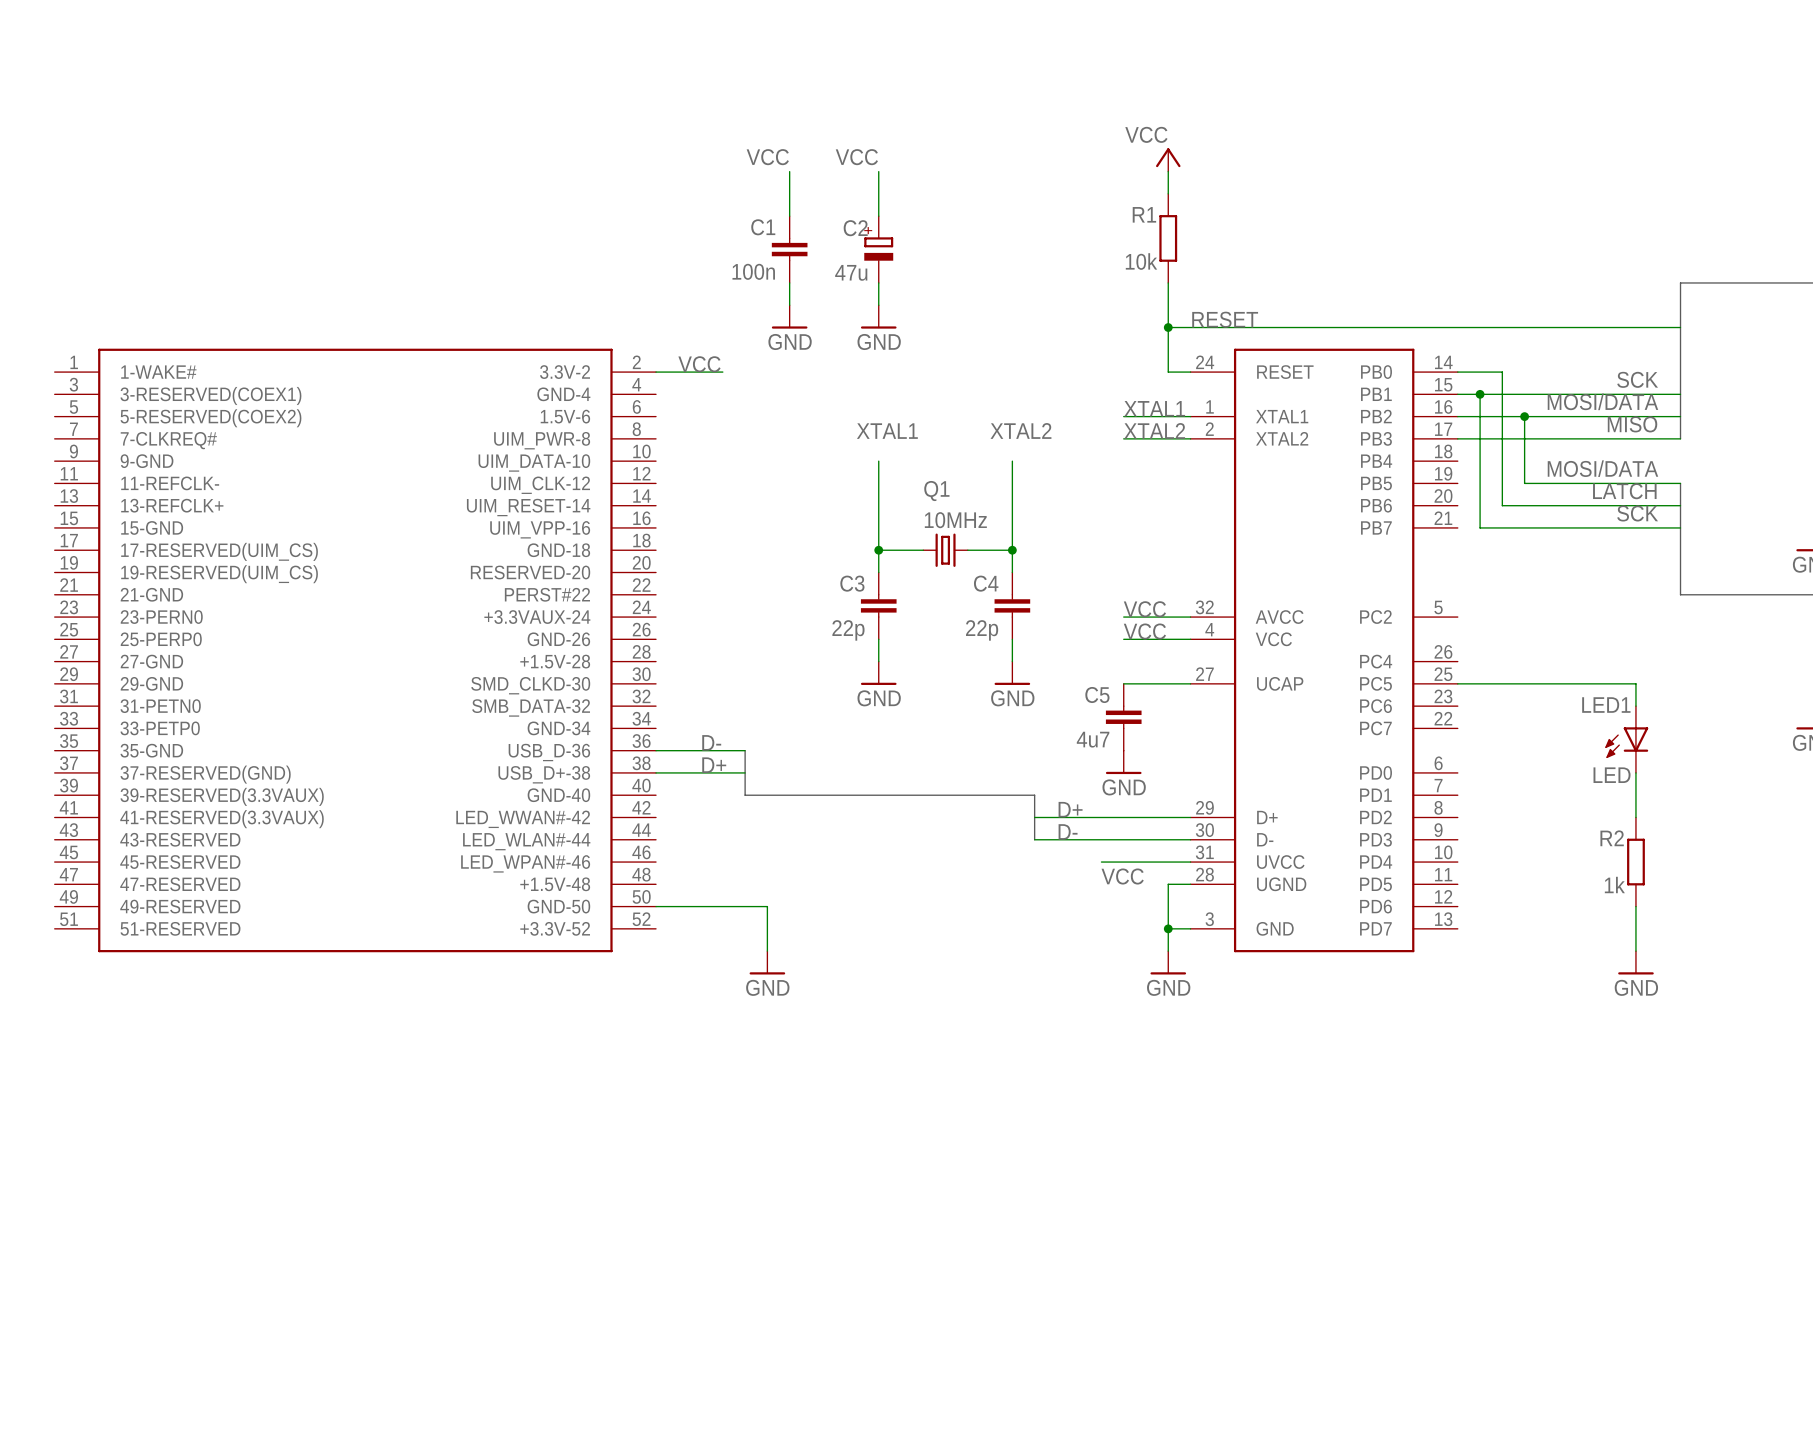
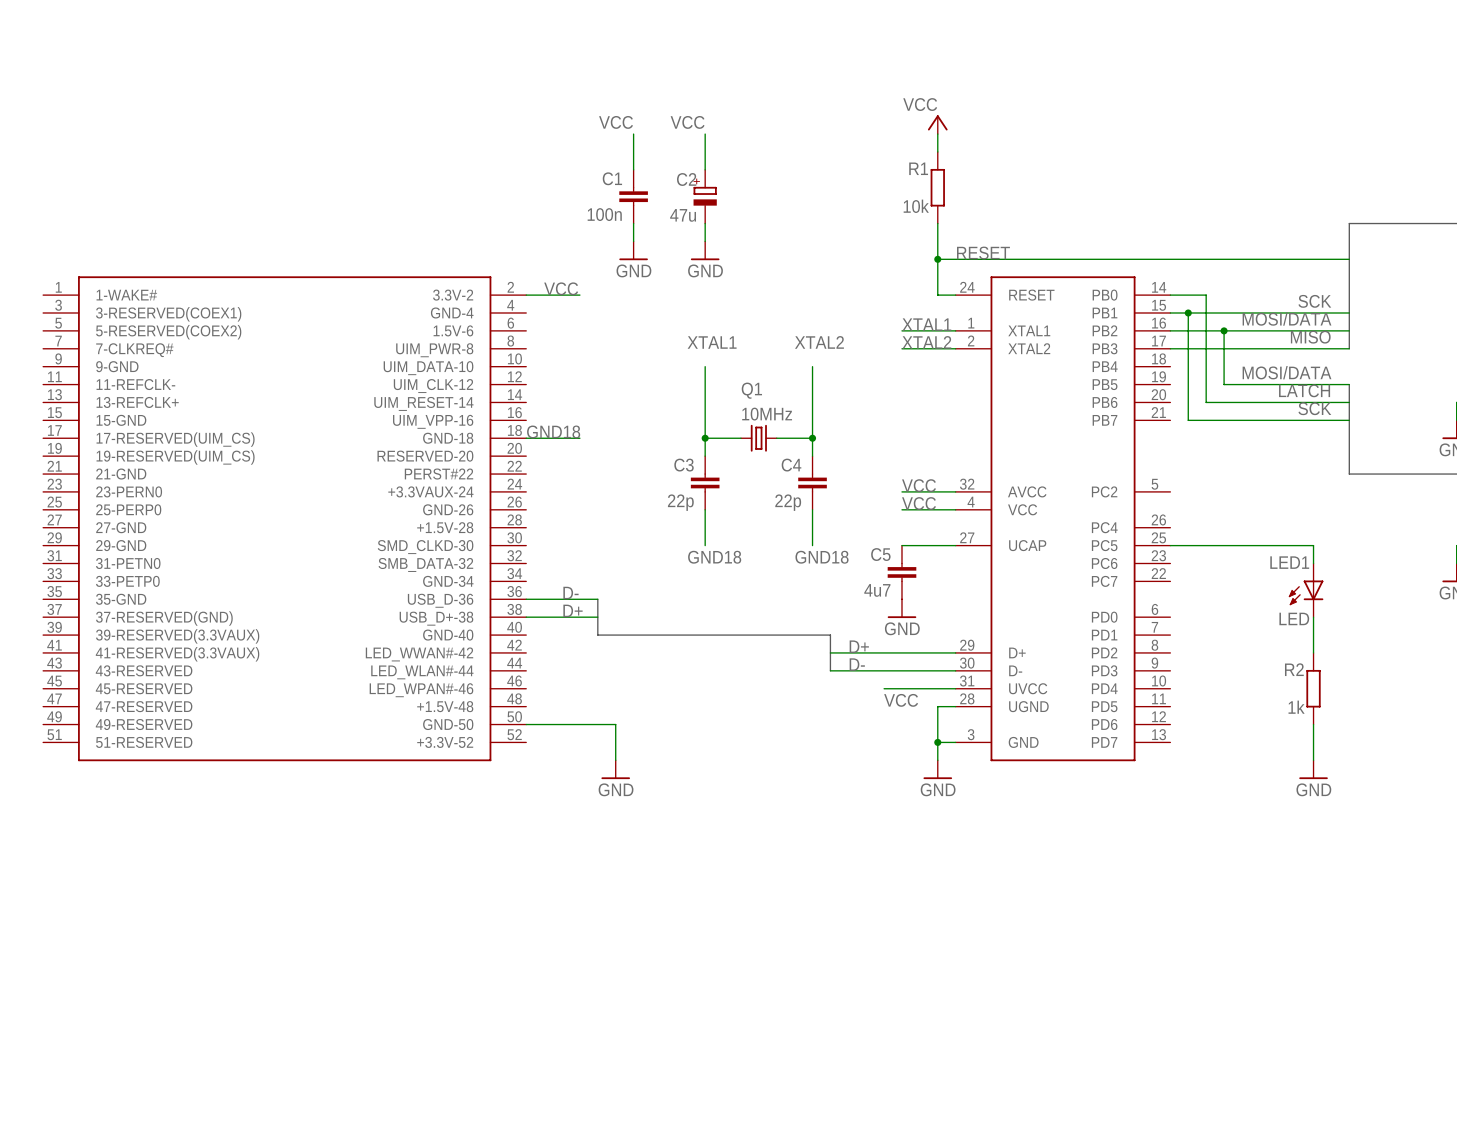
label: none -> GND18 (553, 431)
wire: none -> (526, 438) (579, 438)
power symbol: GND (878, 673) -> none
power symbol: GND (1012, 673) -> none
label: none -> GND18 (714, 557)
label: none -> GND18 (822, 557)

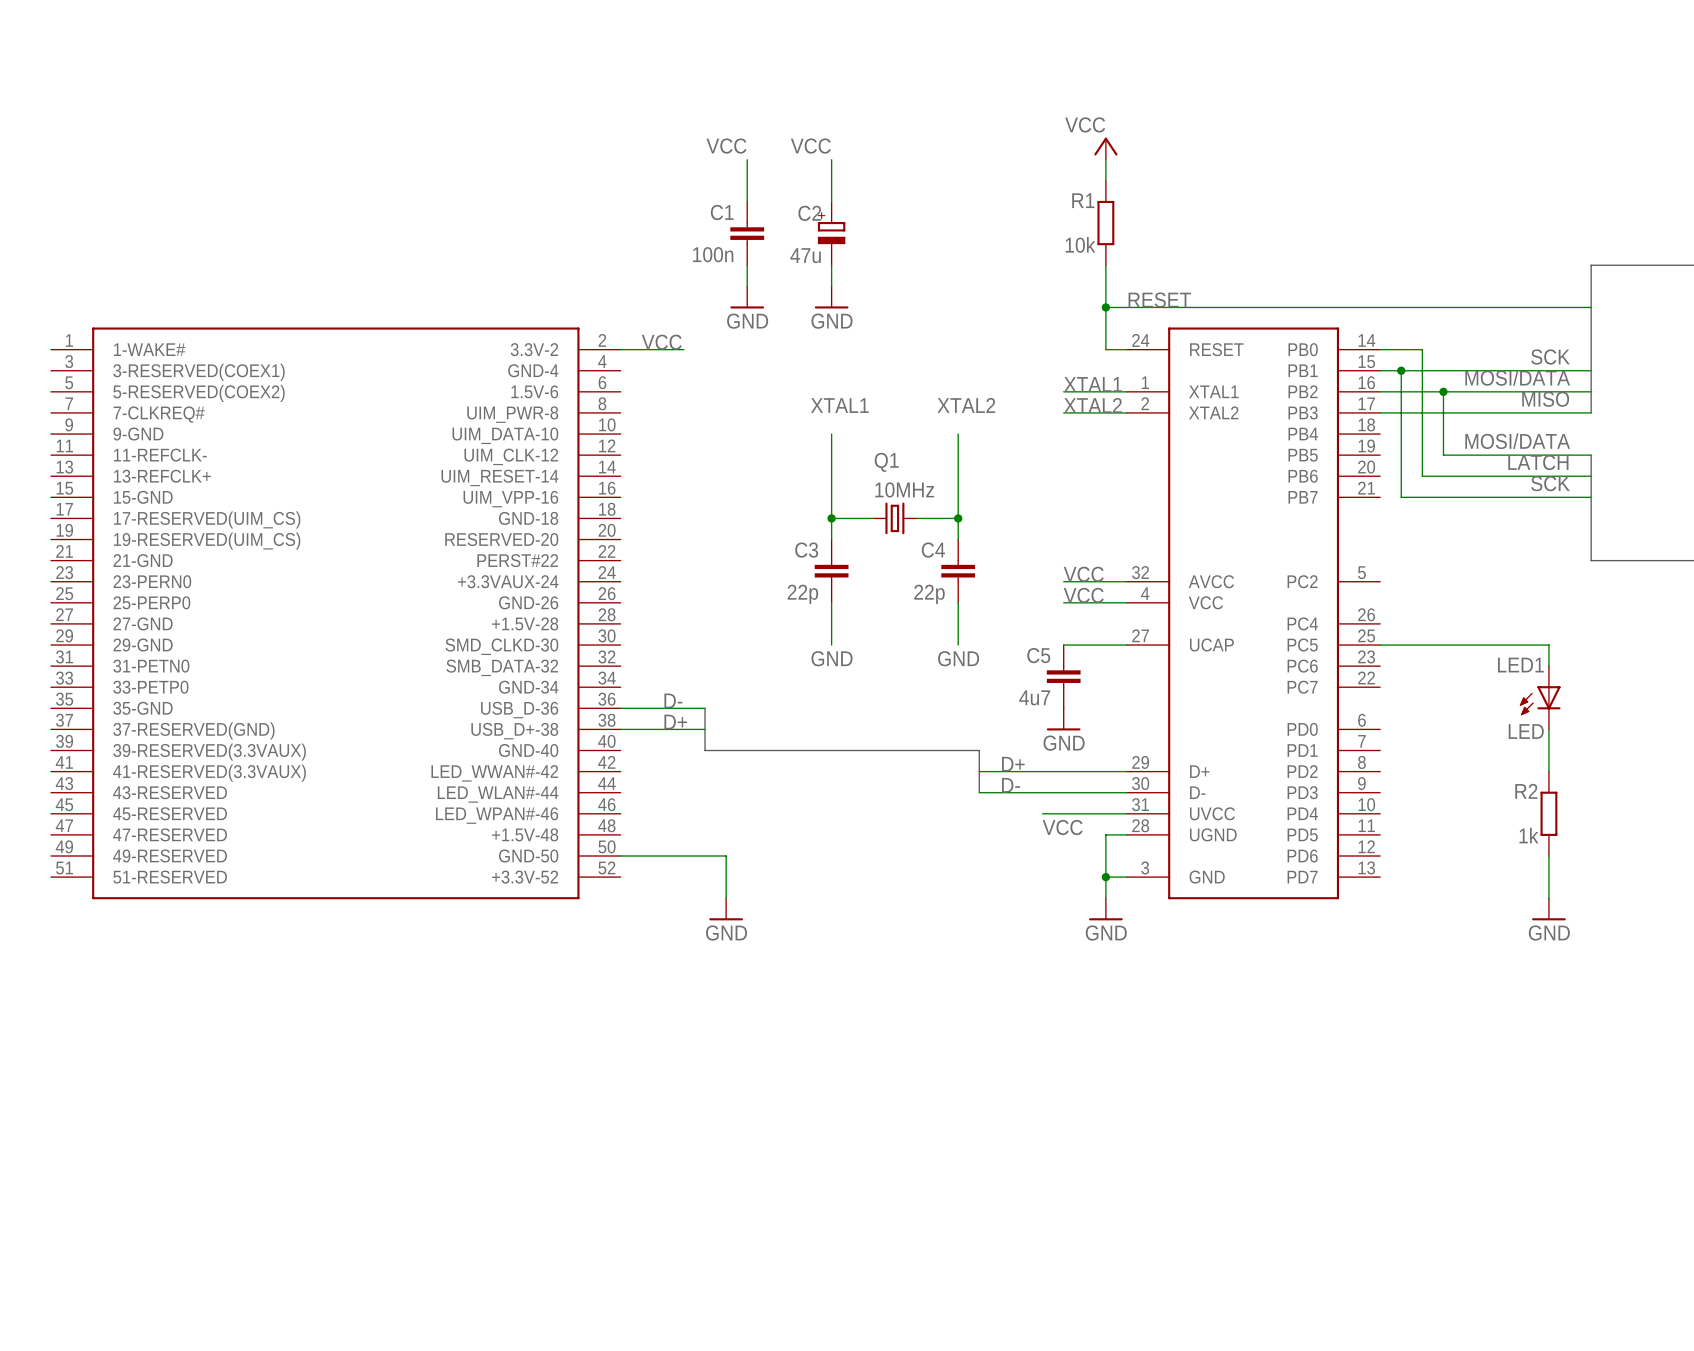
label: GND18 (553, 431) -> none
wire: (526, 438) (579, 438) -> none
label: GND18 (714, 557) -> GND (832, 658)
label: GND18 (822, 557) -> GND (958, 658)

